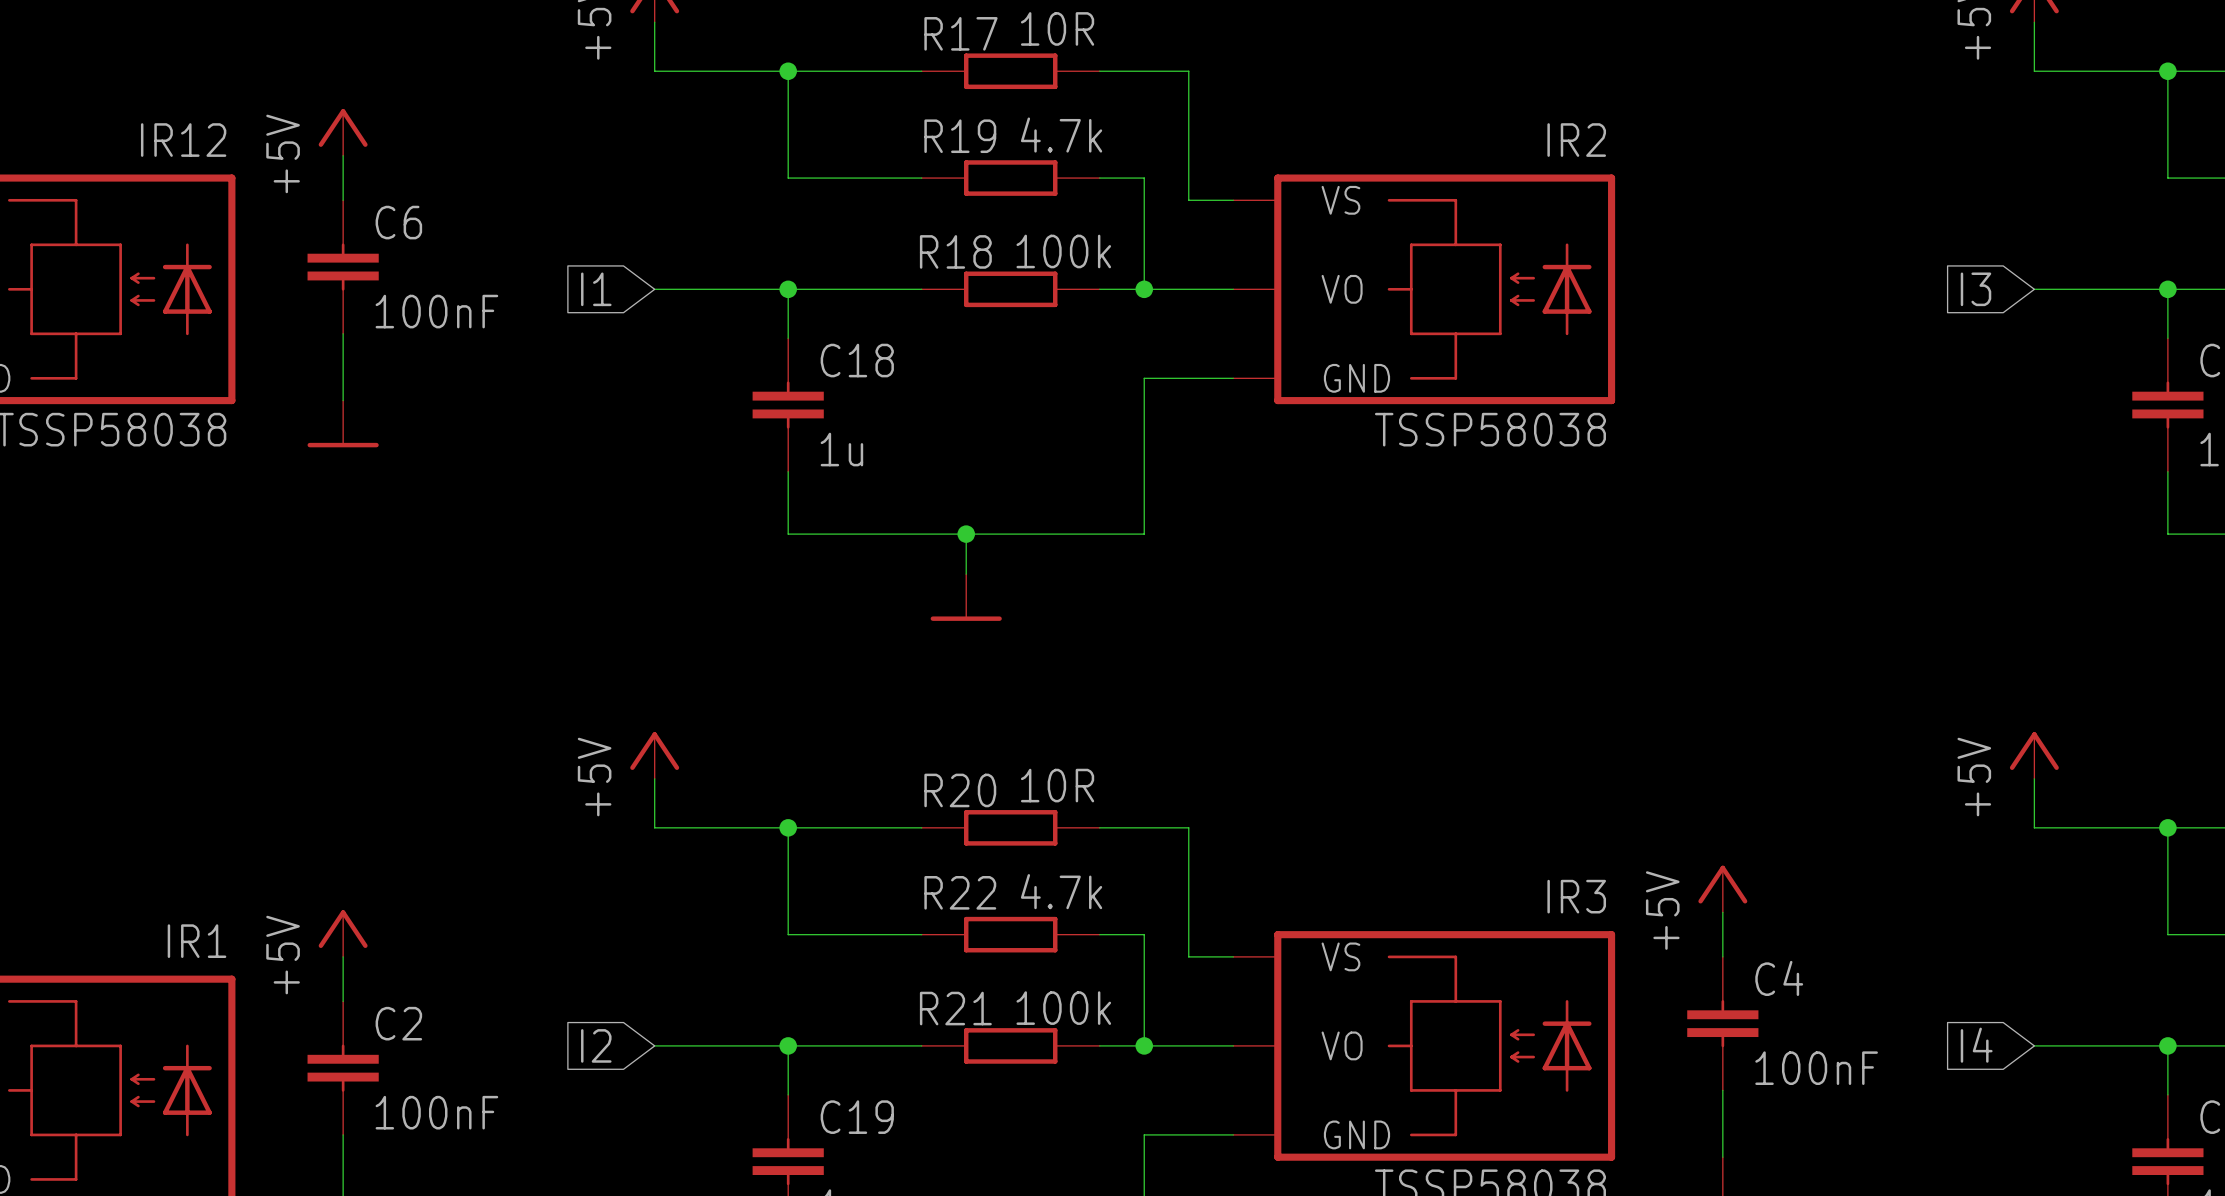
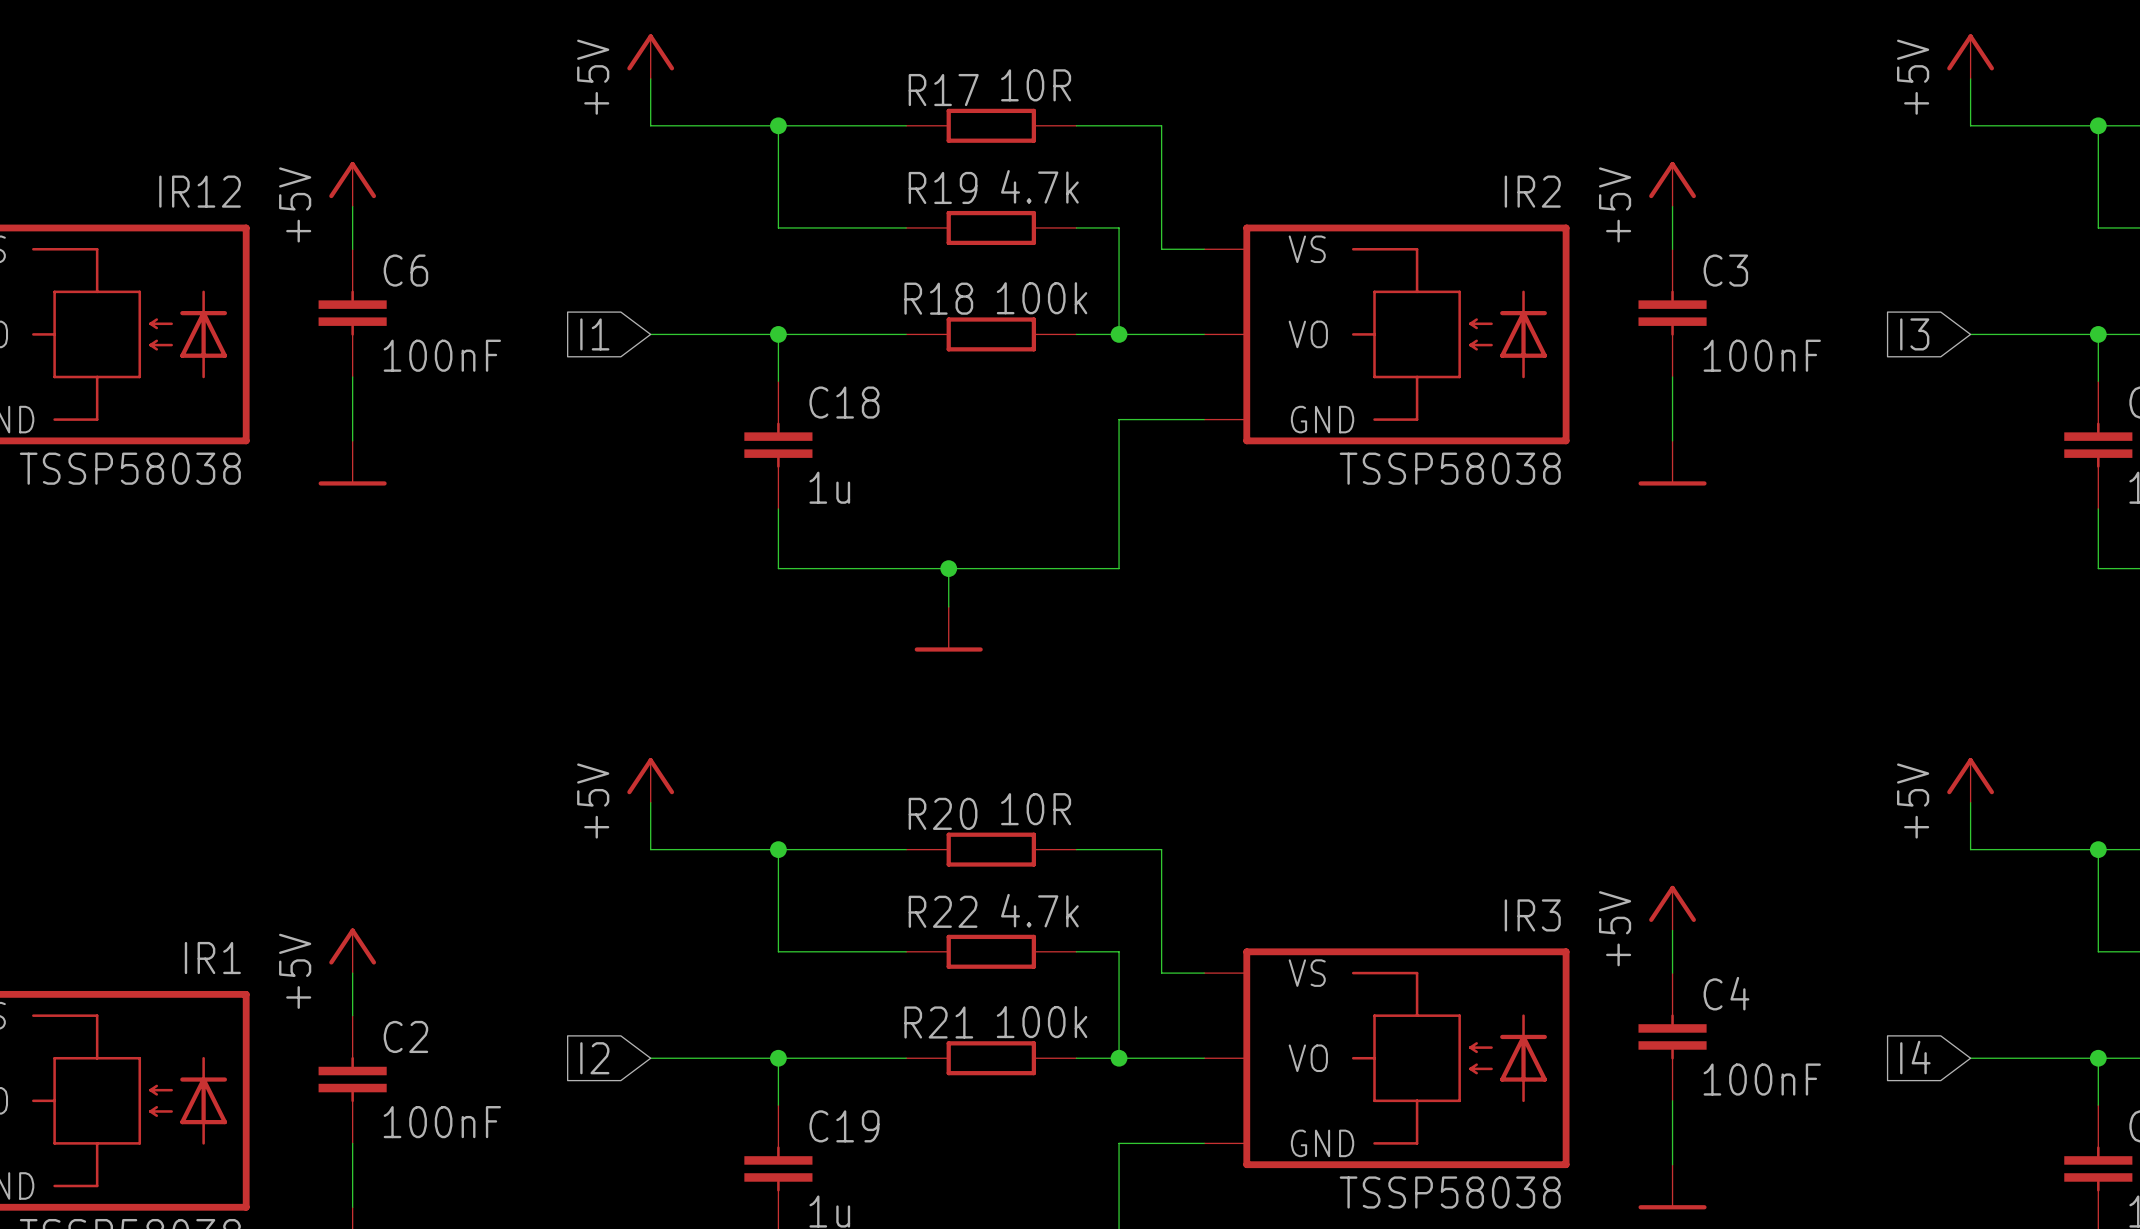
power symbol: none -> +5V (1672, 184)
wire: none -> (1672, 206) (1672, 249)
C3: none -> 100nF (1672, 313)
wire: none -> (1672, 377) (1672, 440)
power symbol: none -> (1672, 463)

